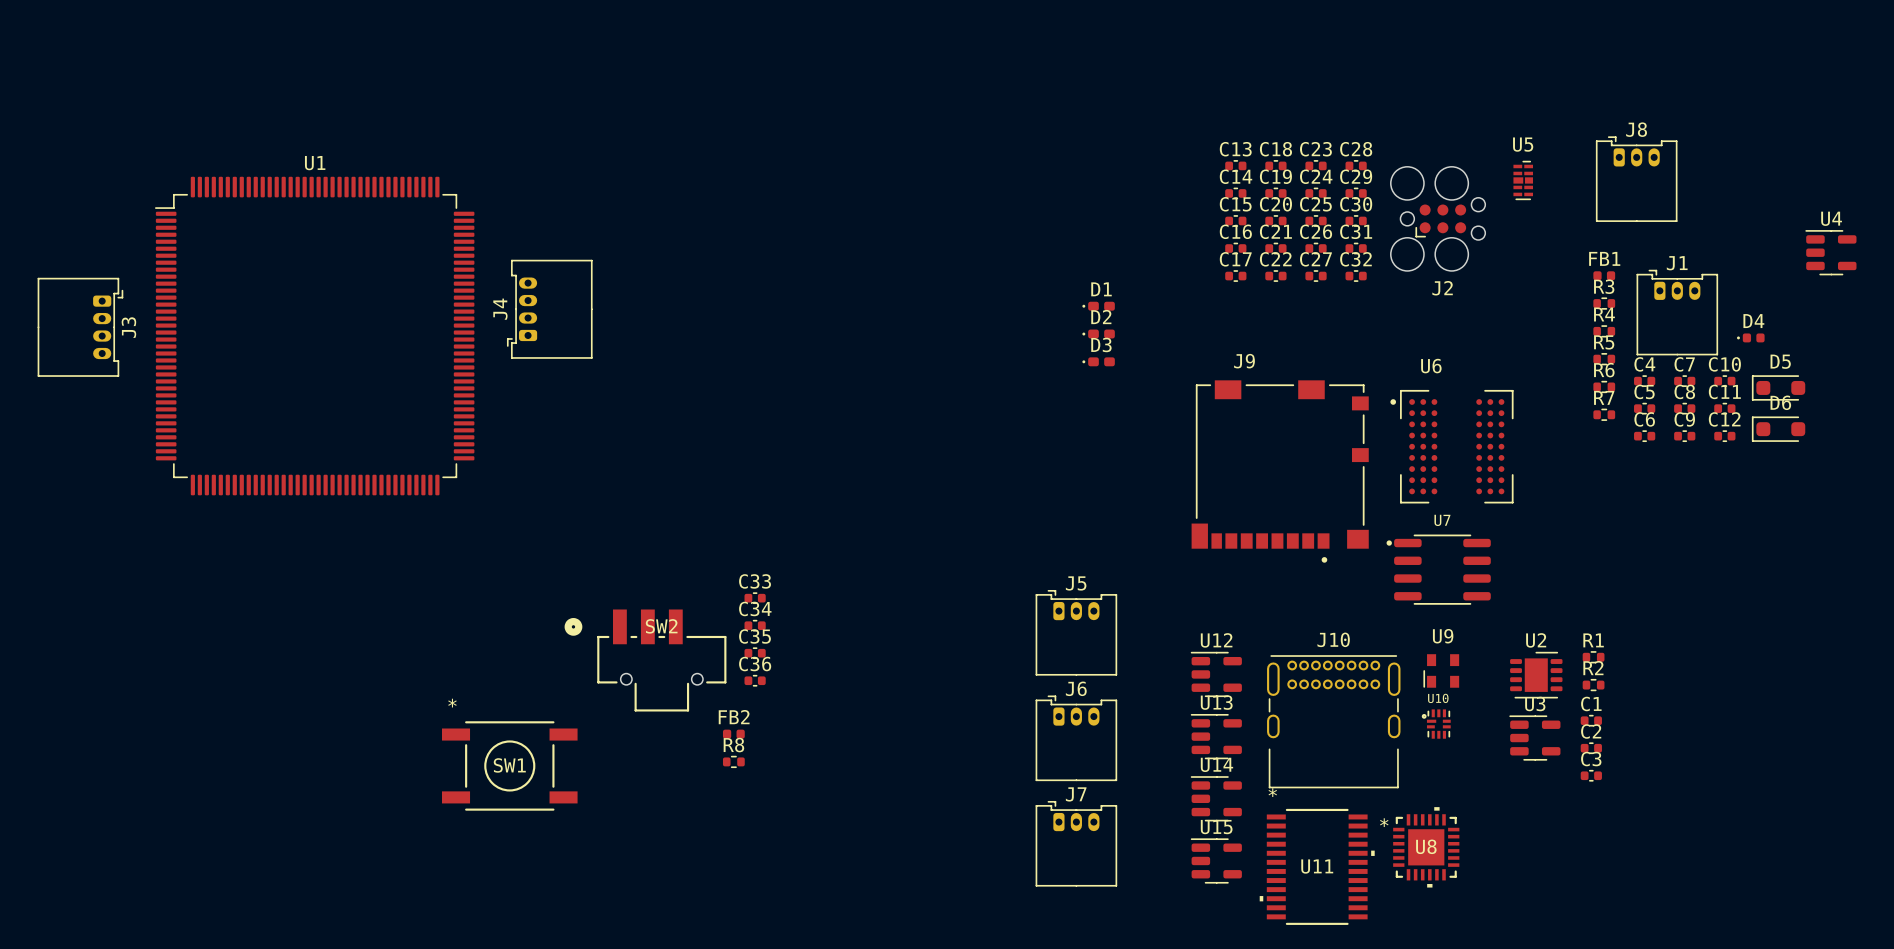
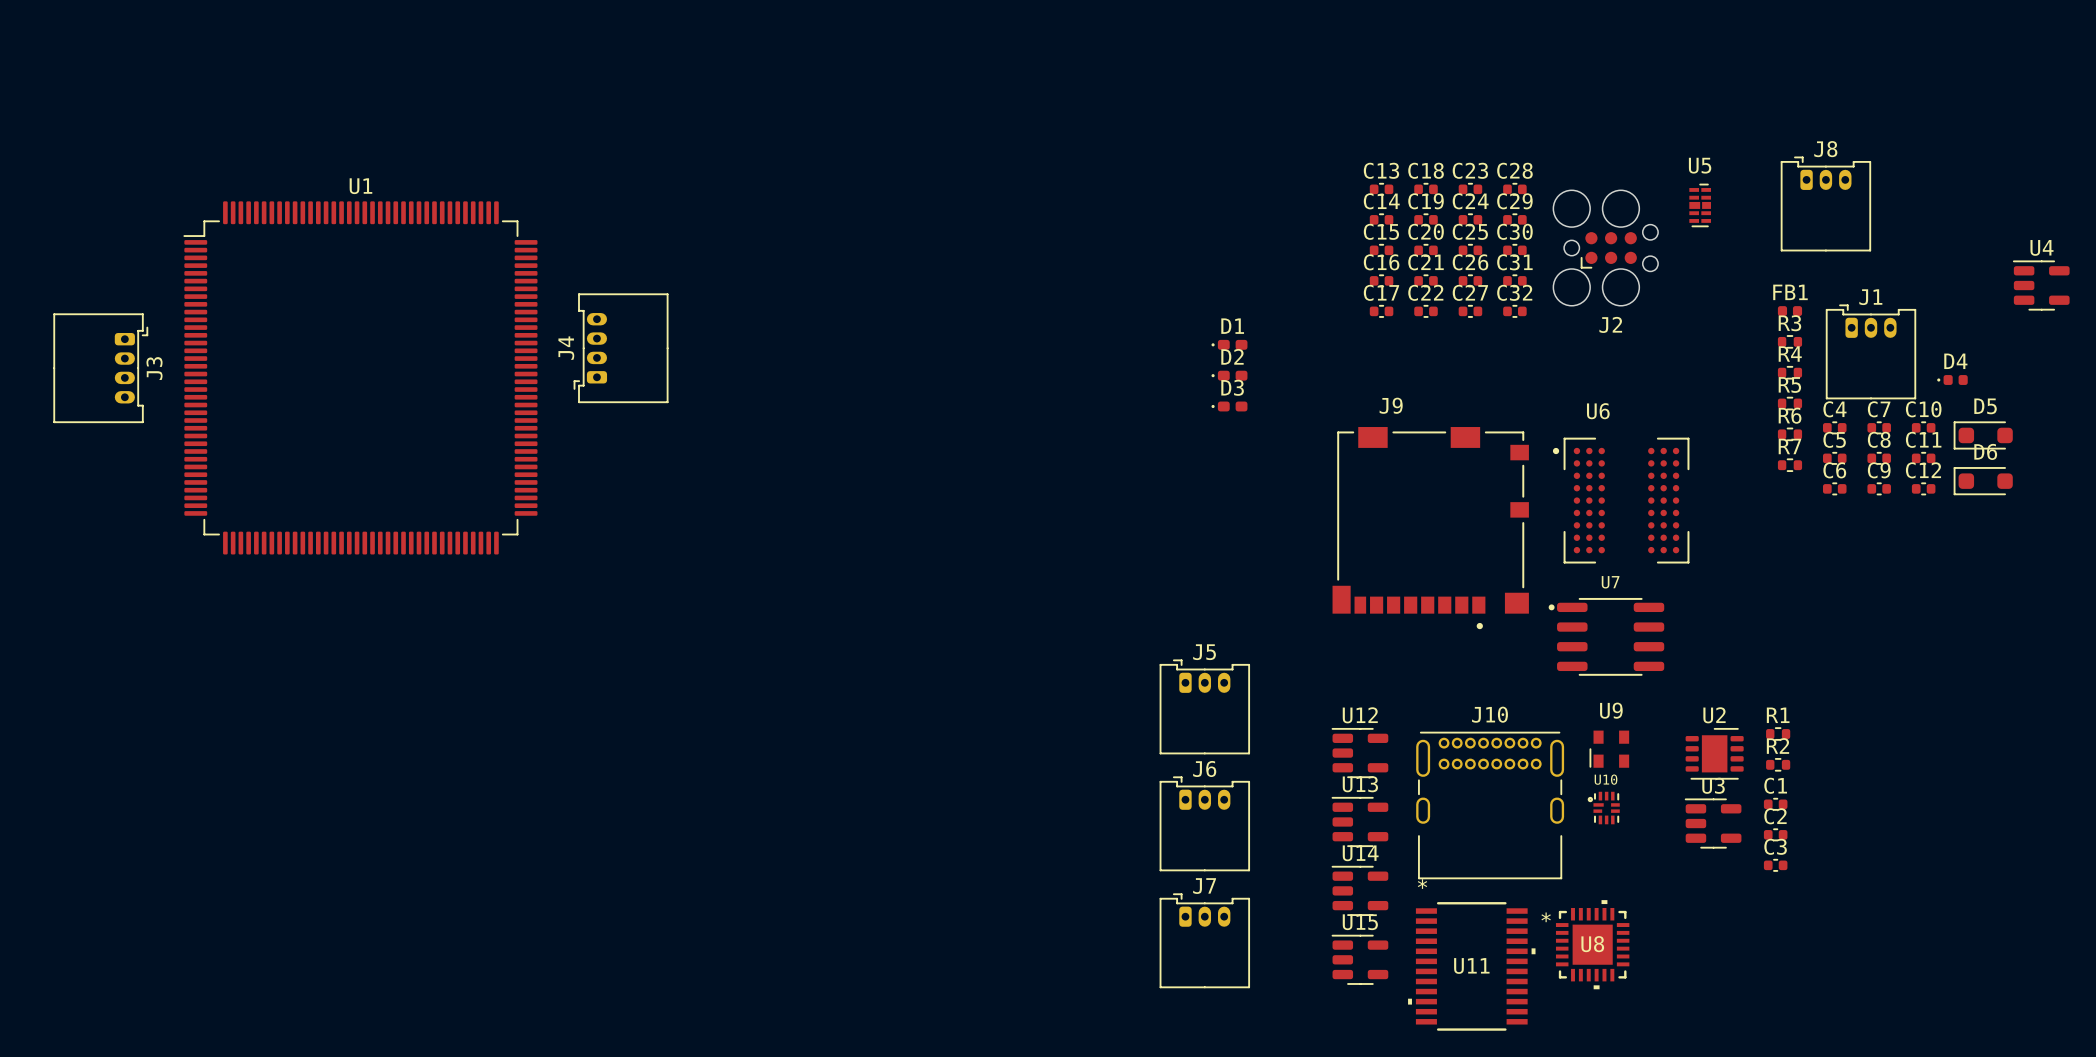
C33: (755, 598) -> none
C34: (755, 625) -> none
C35: (755, 653) -> none
SW2: (645, 660) -> none
C36: (755, 680) -> none
FB2: (733, 734) -> none
R8: (733, 761) -> none
SW1: (509, 765) -> none

